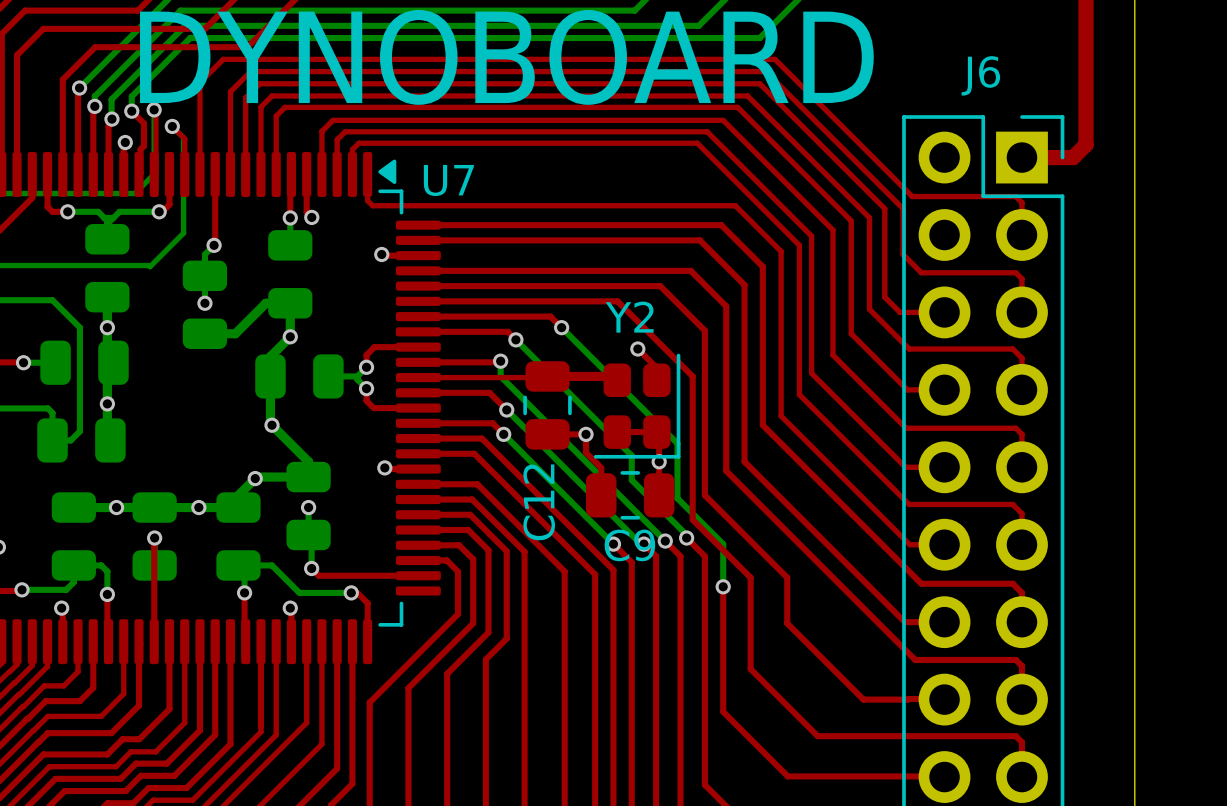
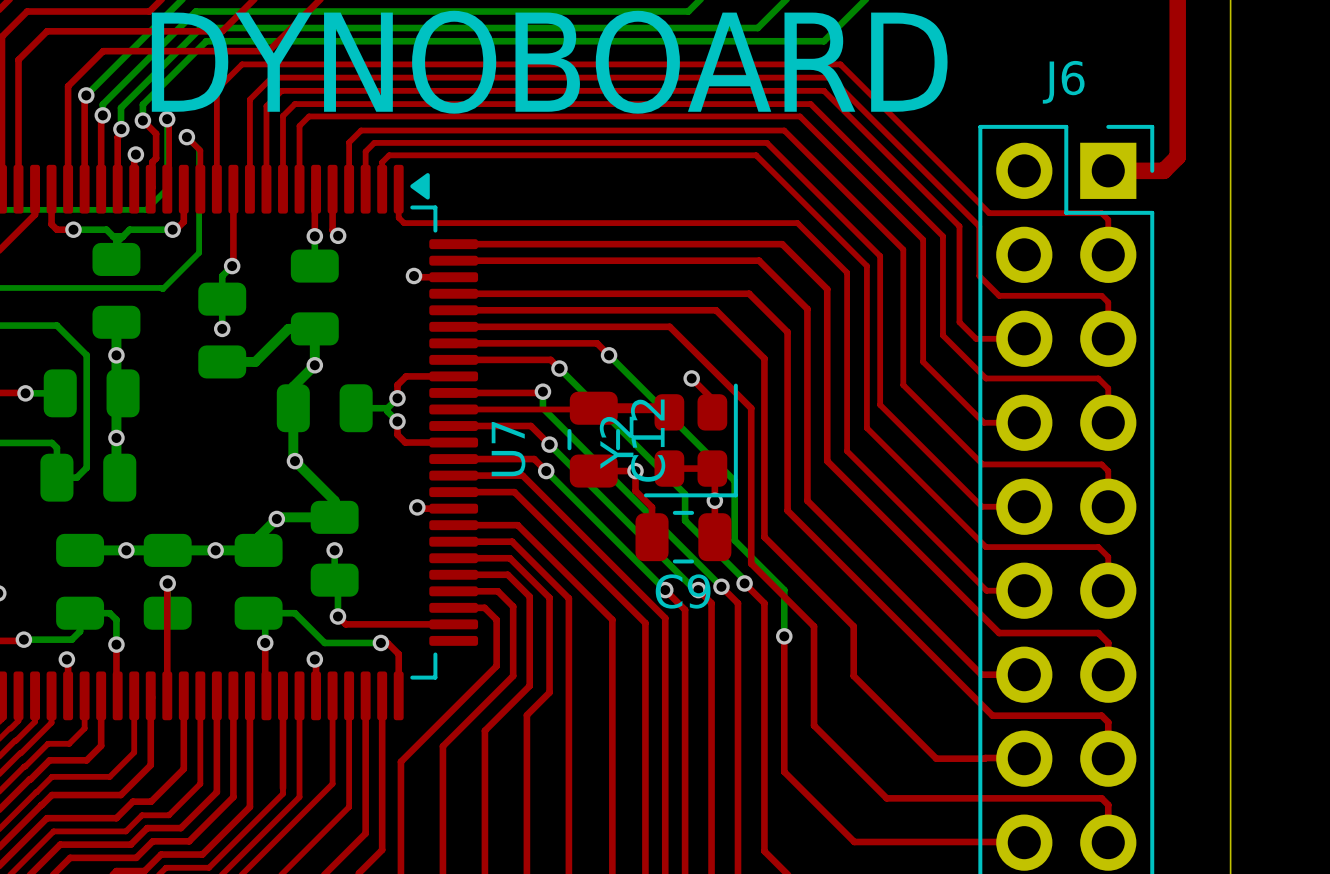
U7 name rotation: 0° (448, 180) -> 90° counterclockwise (508, 449)
U7 name position: U7 (448, 180) -> U7 (508, 449)
Y2 name rotation: 0° (629, 317) -> 90° counterclockwise (616, 442)
Y2 name position: Y2 (629, 317) -> Y2 (616, 442)
C12 name position: C12 (539, 502) -> C12 (648, 440)

